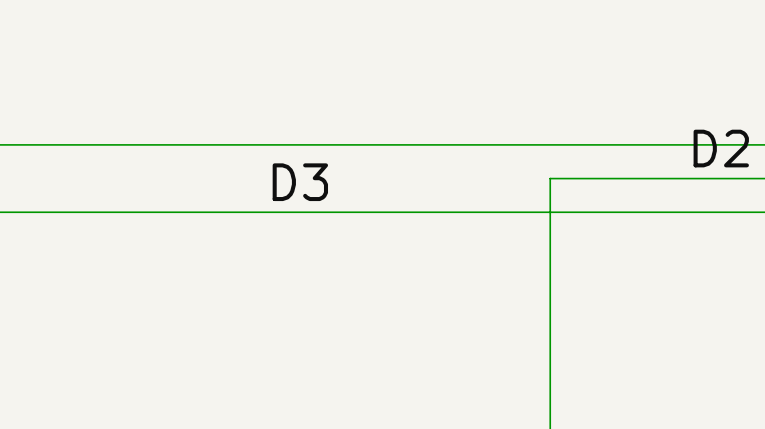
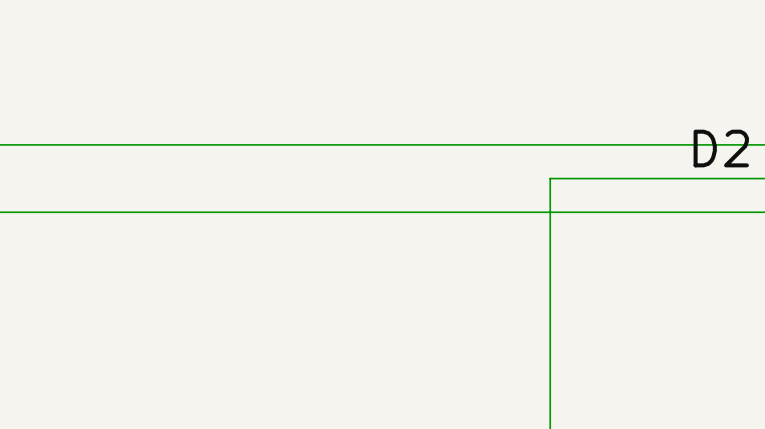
label: D3 (300, 182) -> none

